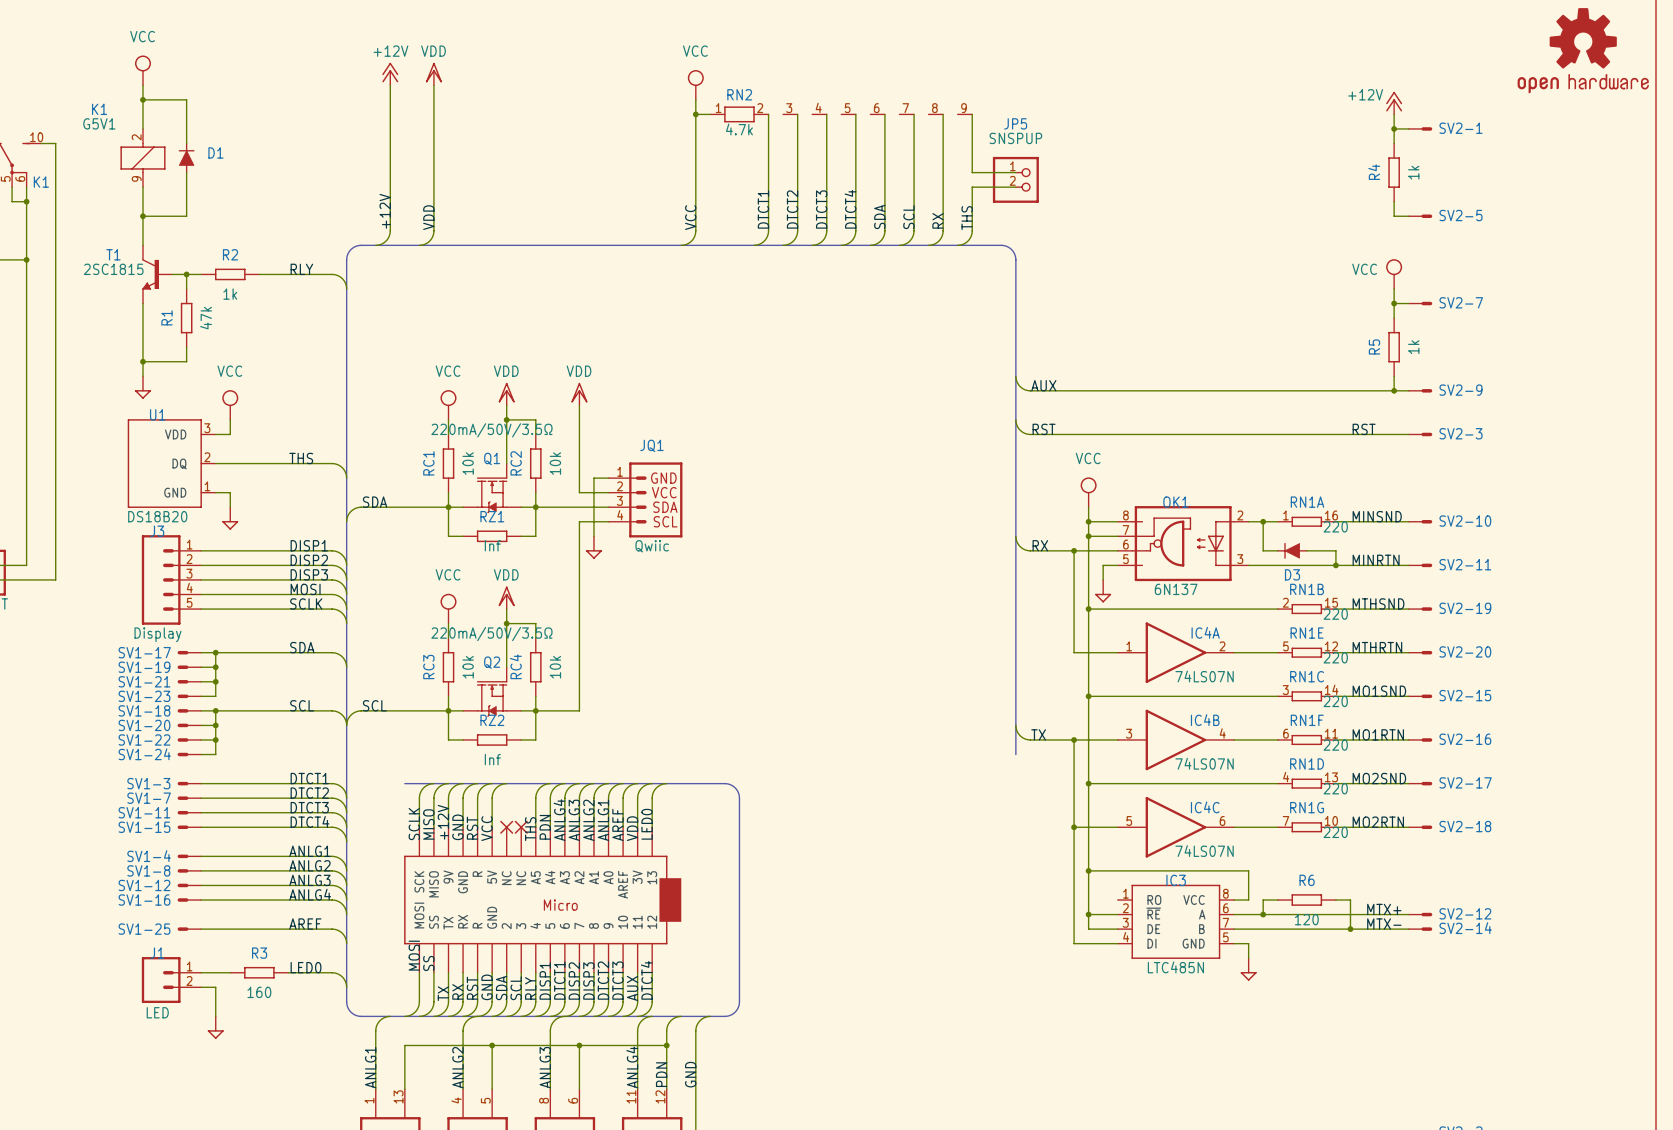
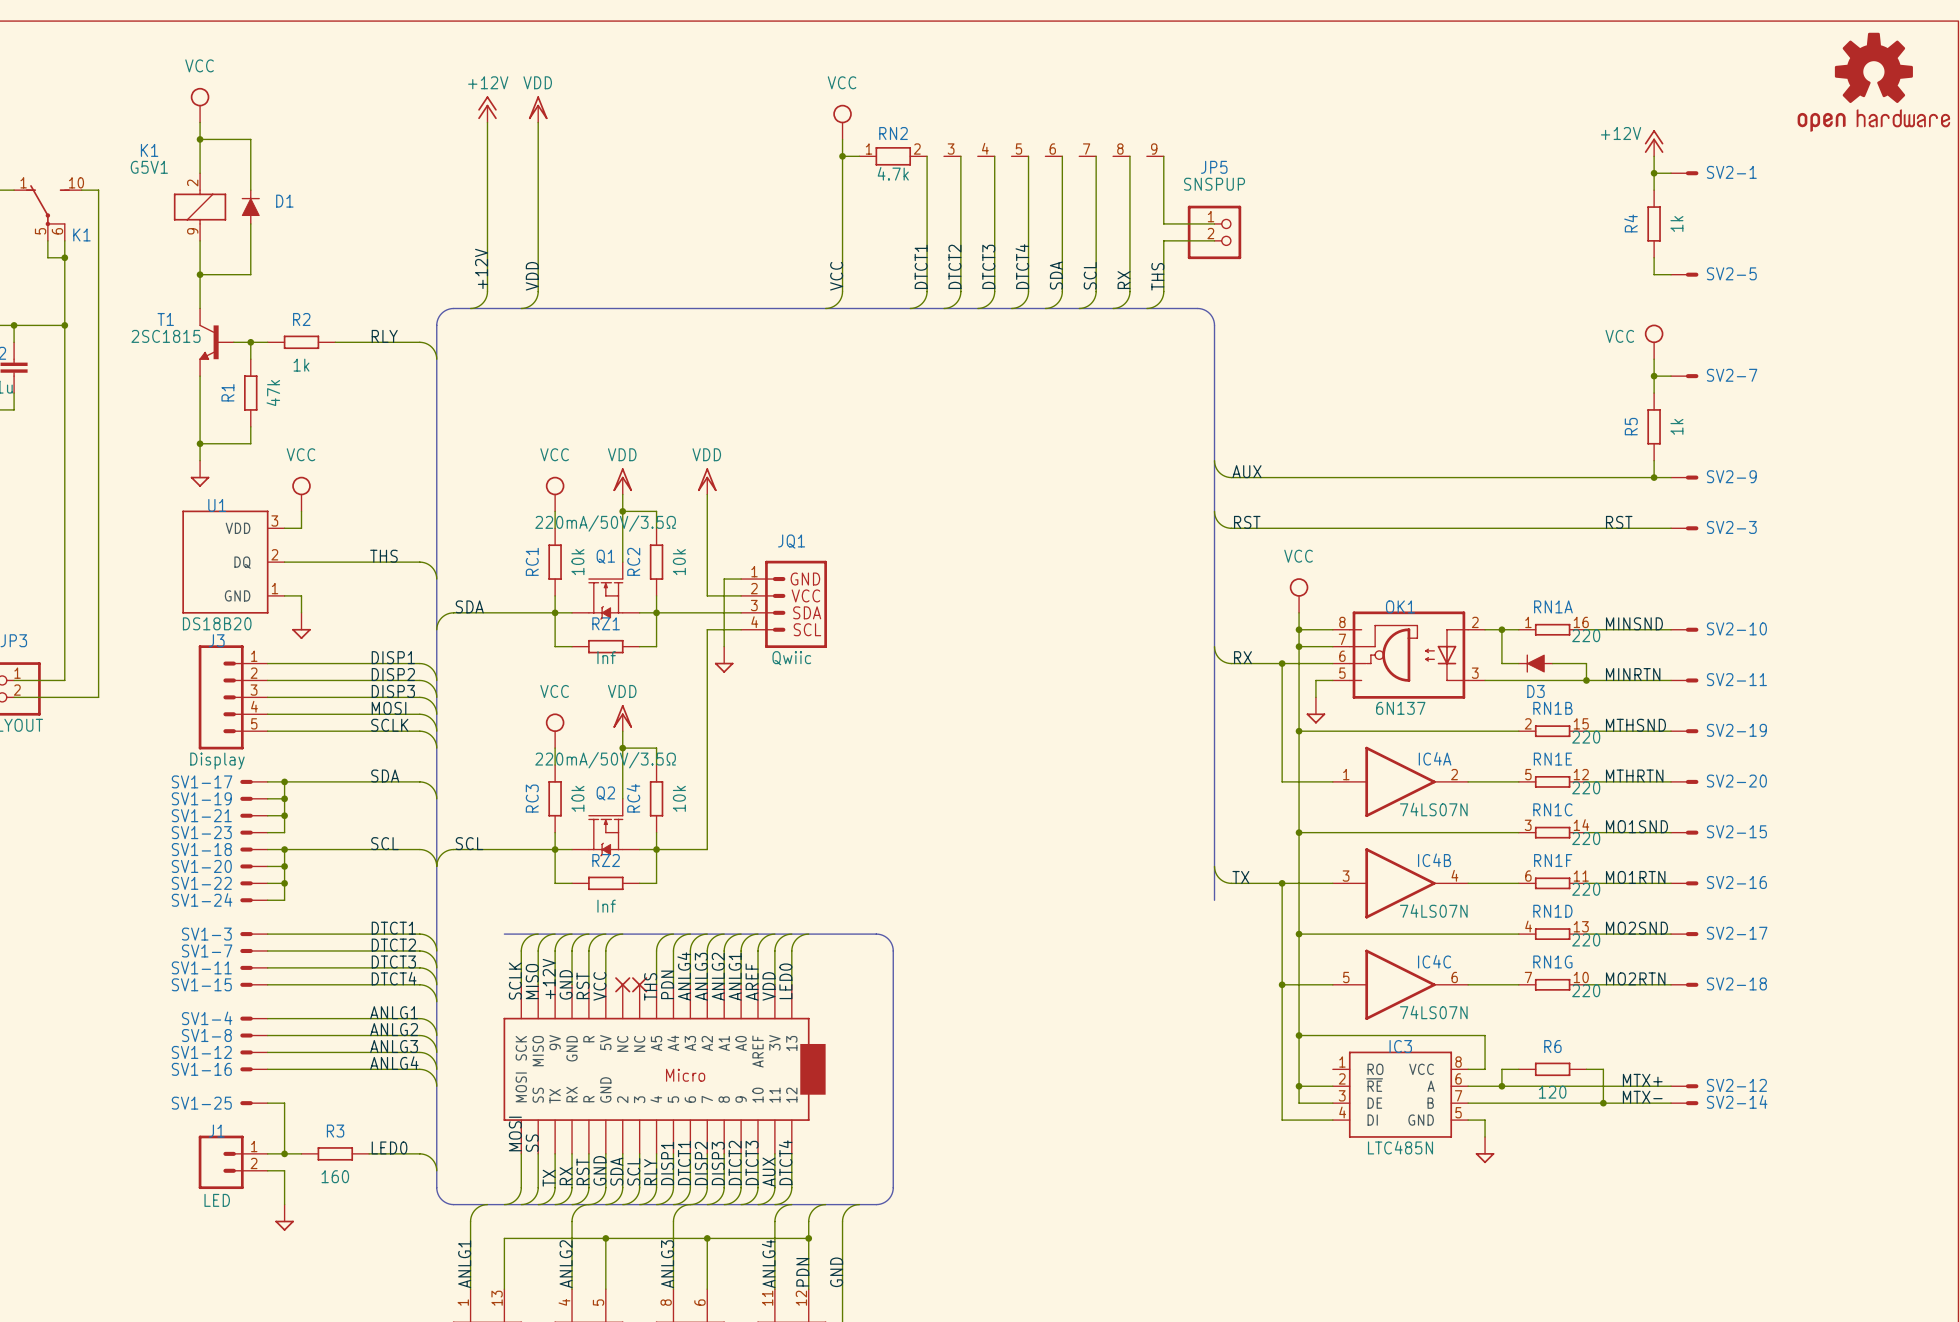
label: AREF (305, 924) -> none
wire: (215, 929) (334, 929) (342, 933) (346, 943) -> (284, 1103) (284, 1153)
junction: none -> (284, 1153)

